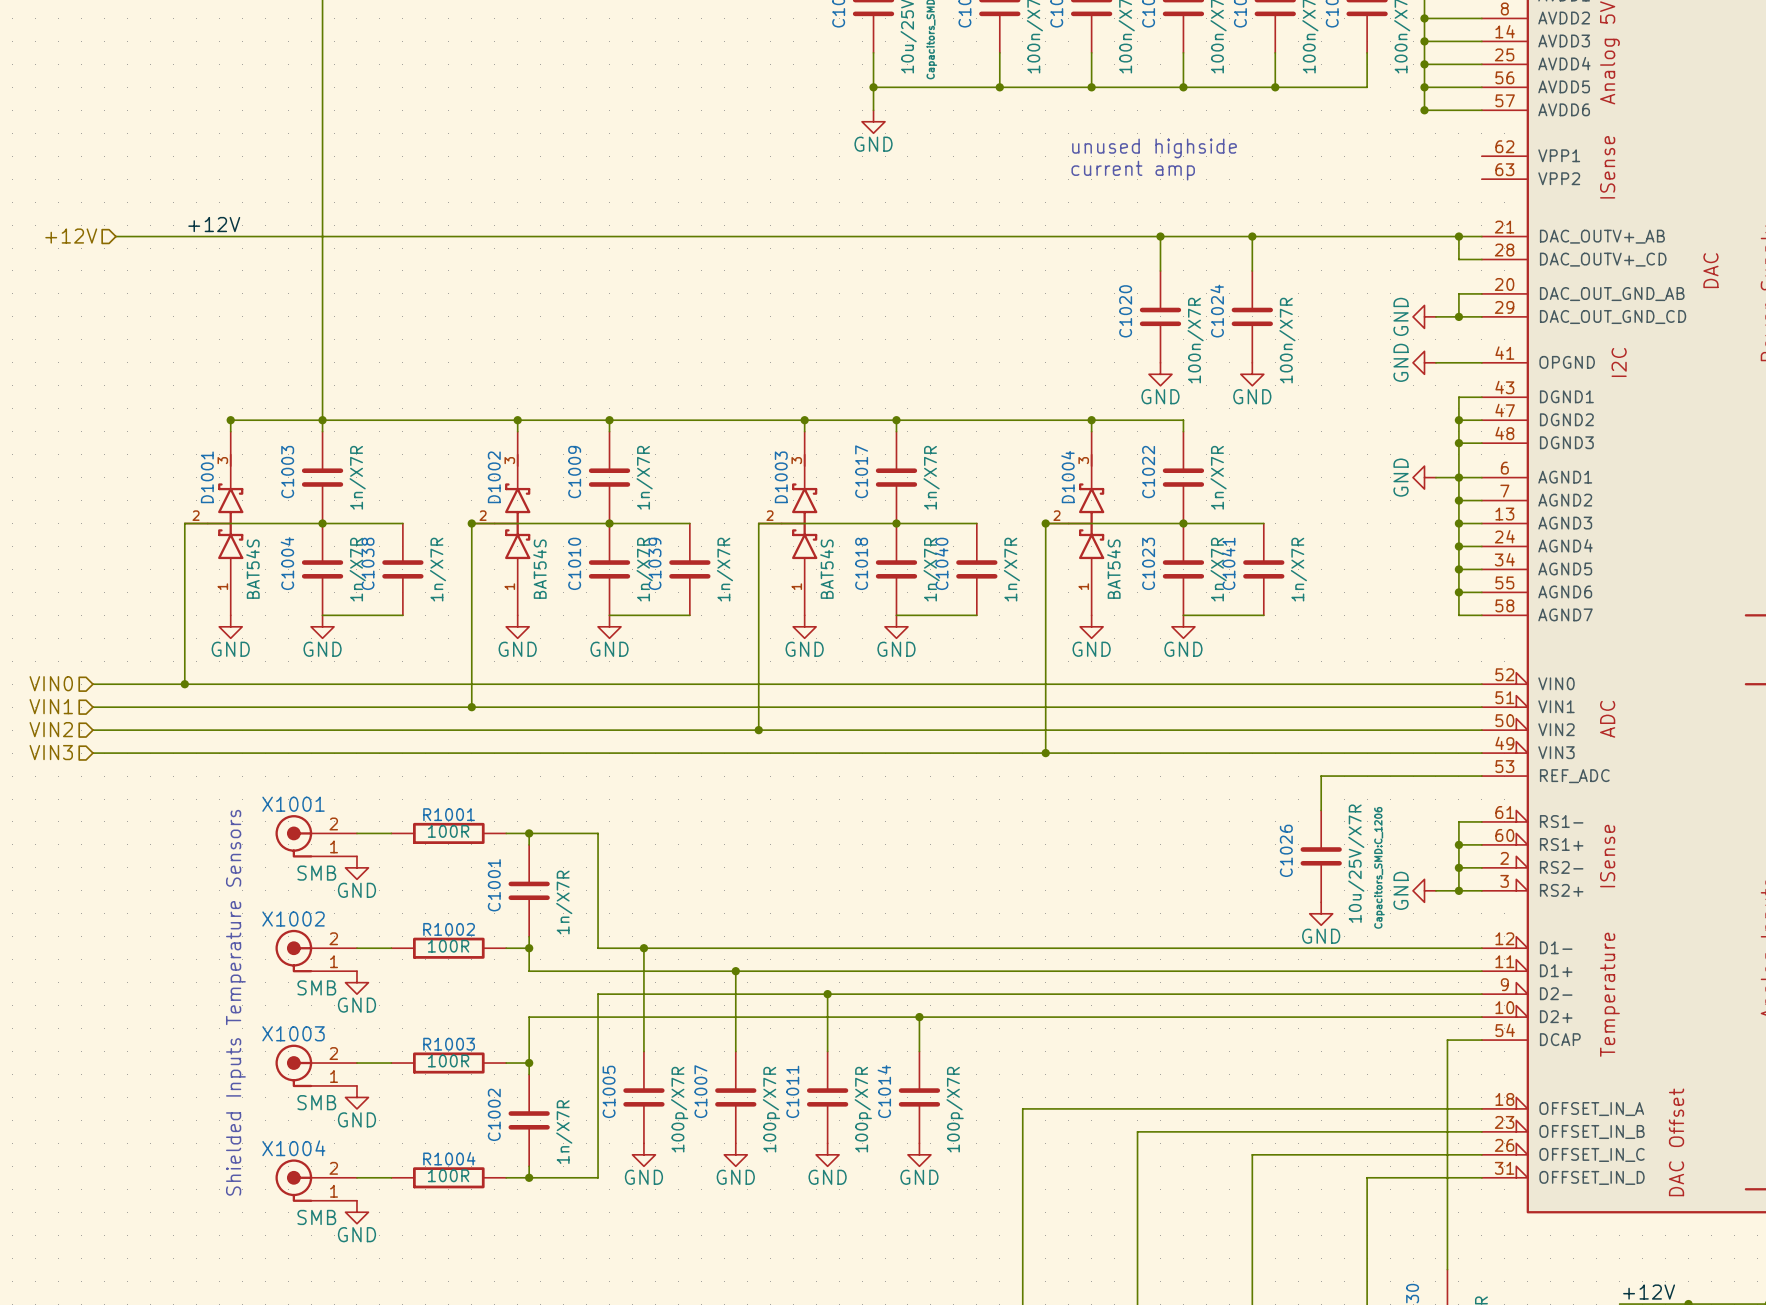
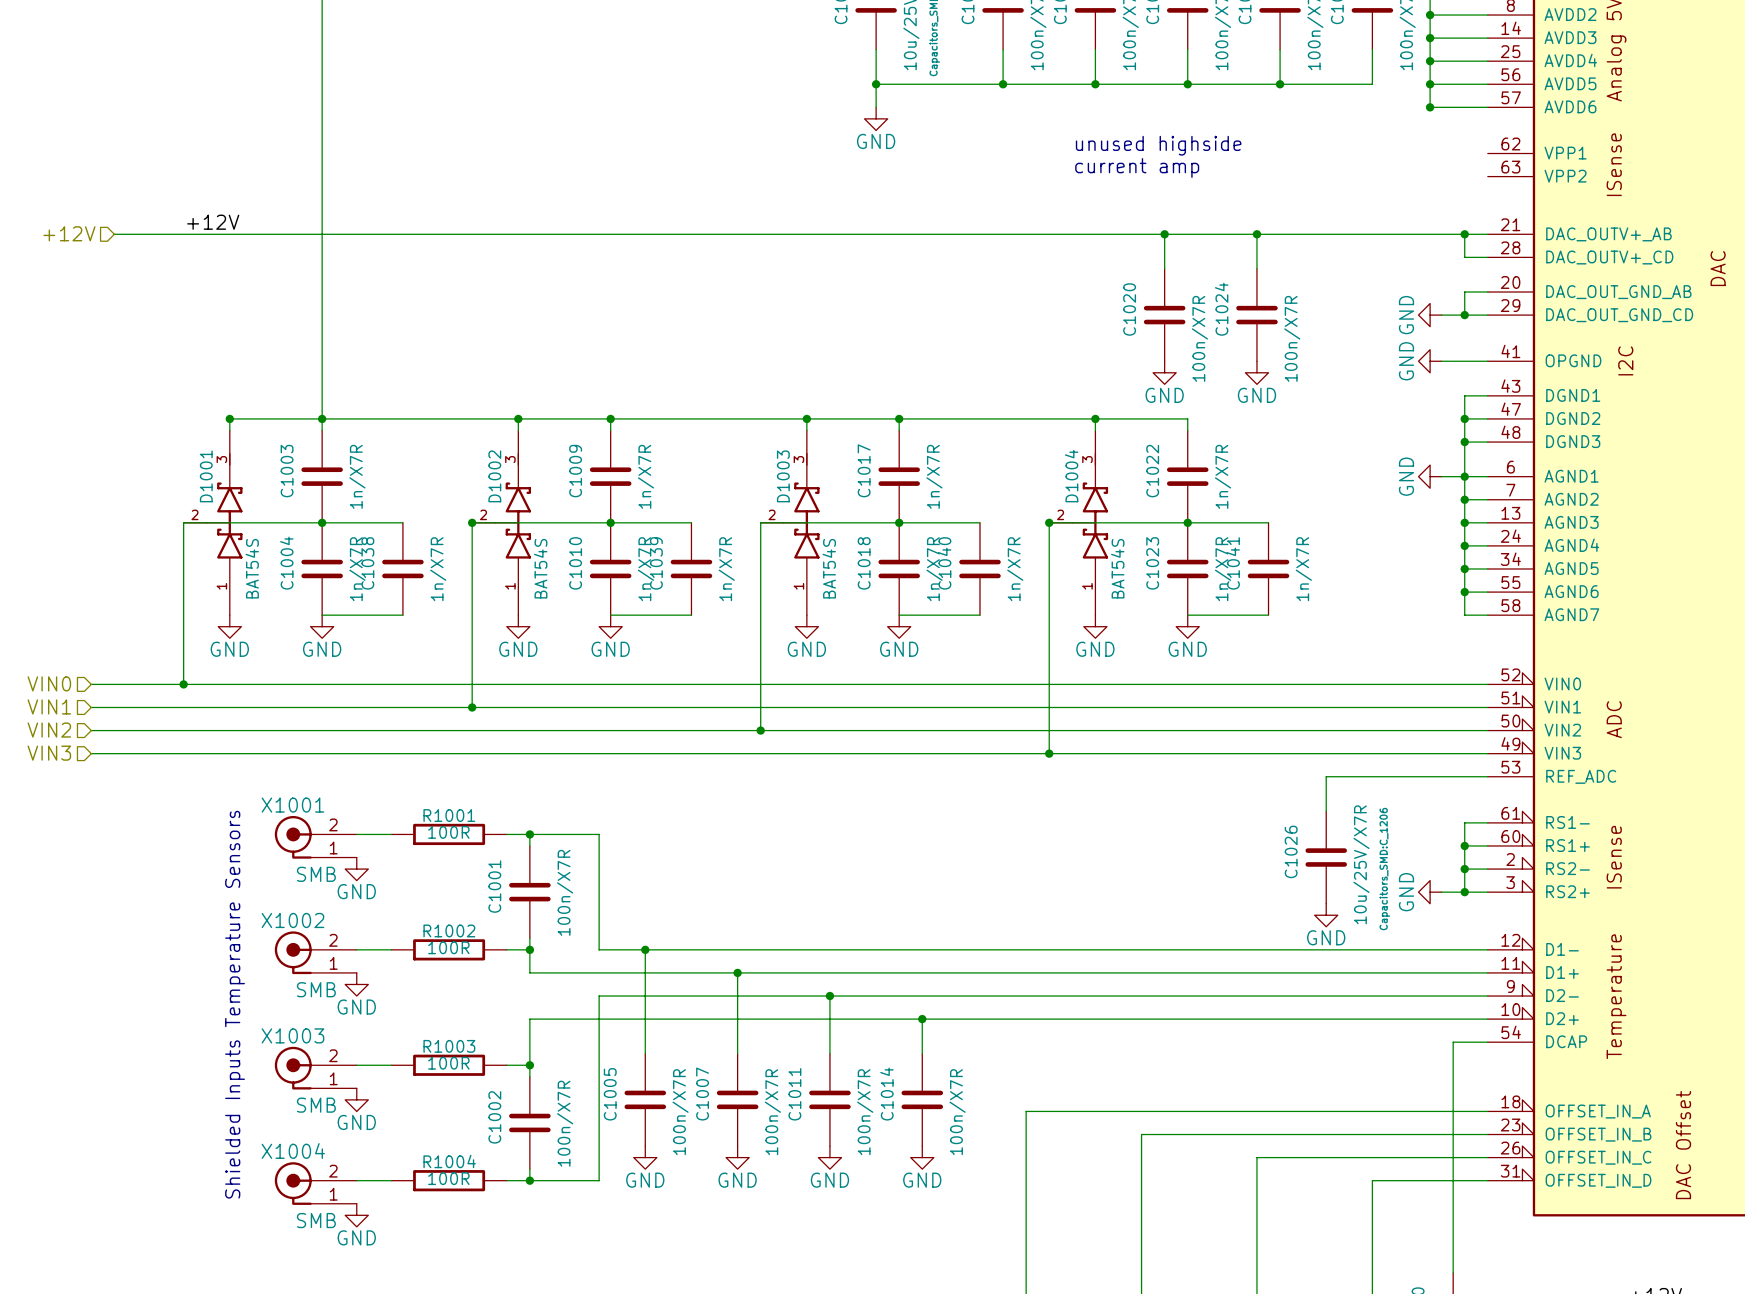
C1001 value: 1n/X7R (564, 902) -> 100n/X7R (565, 892)
C1005 value: 100p/X7R (679, 1109) -> 100n/X7R (680, 1112)
C1007 value: 100p/X7R (771, 1109) -> 100n/X7R (772, 1112)
C1011 value: 100p/X7R (863, 1109) -> 100n/X7R (865, 1112)
C1014 value: 100p/X7R (955, 1109) -> 100n/X7R (957, 1112)
C1002 value: 1n/X7R (564, 1132) -> 100n/X7R (565, 1123)

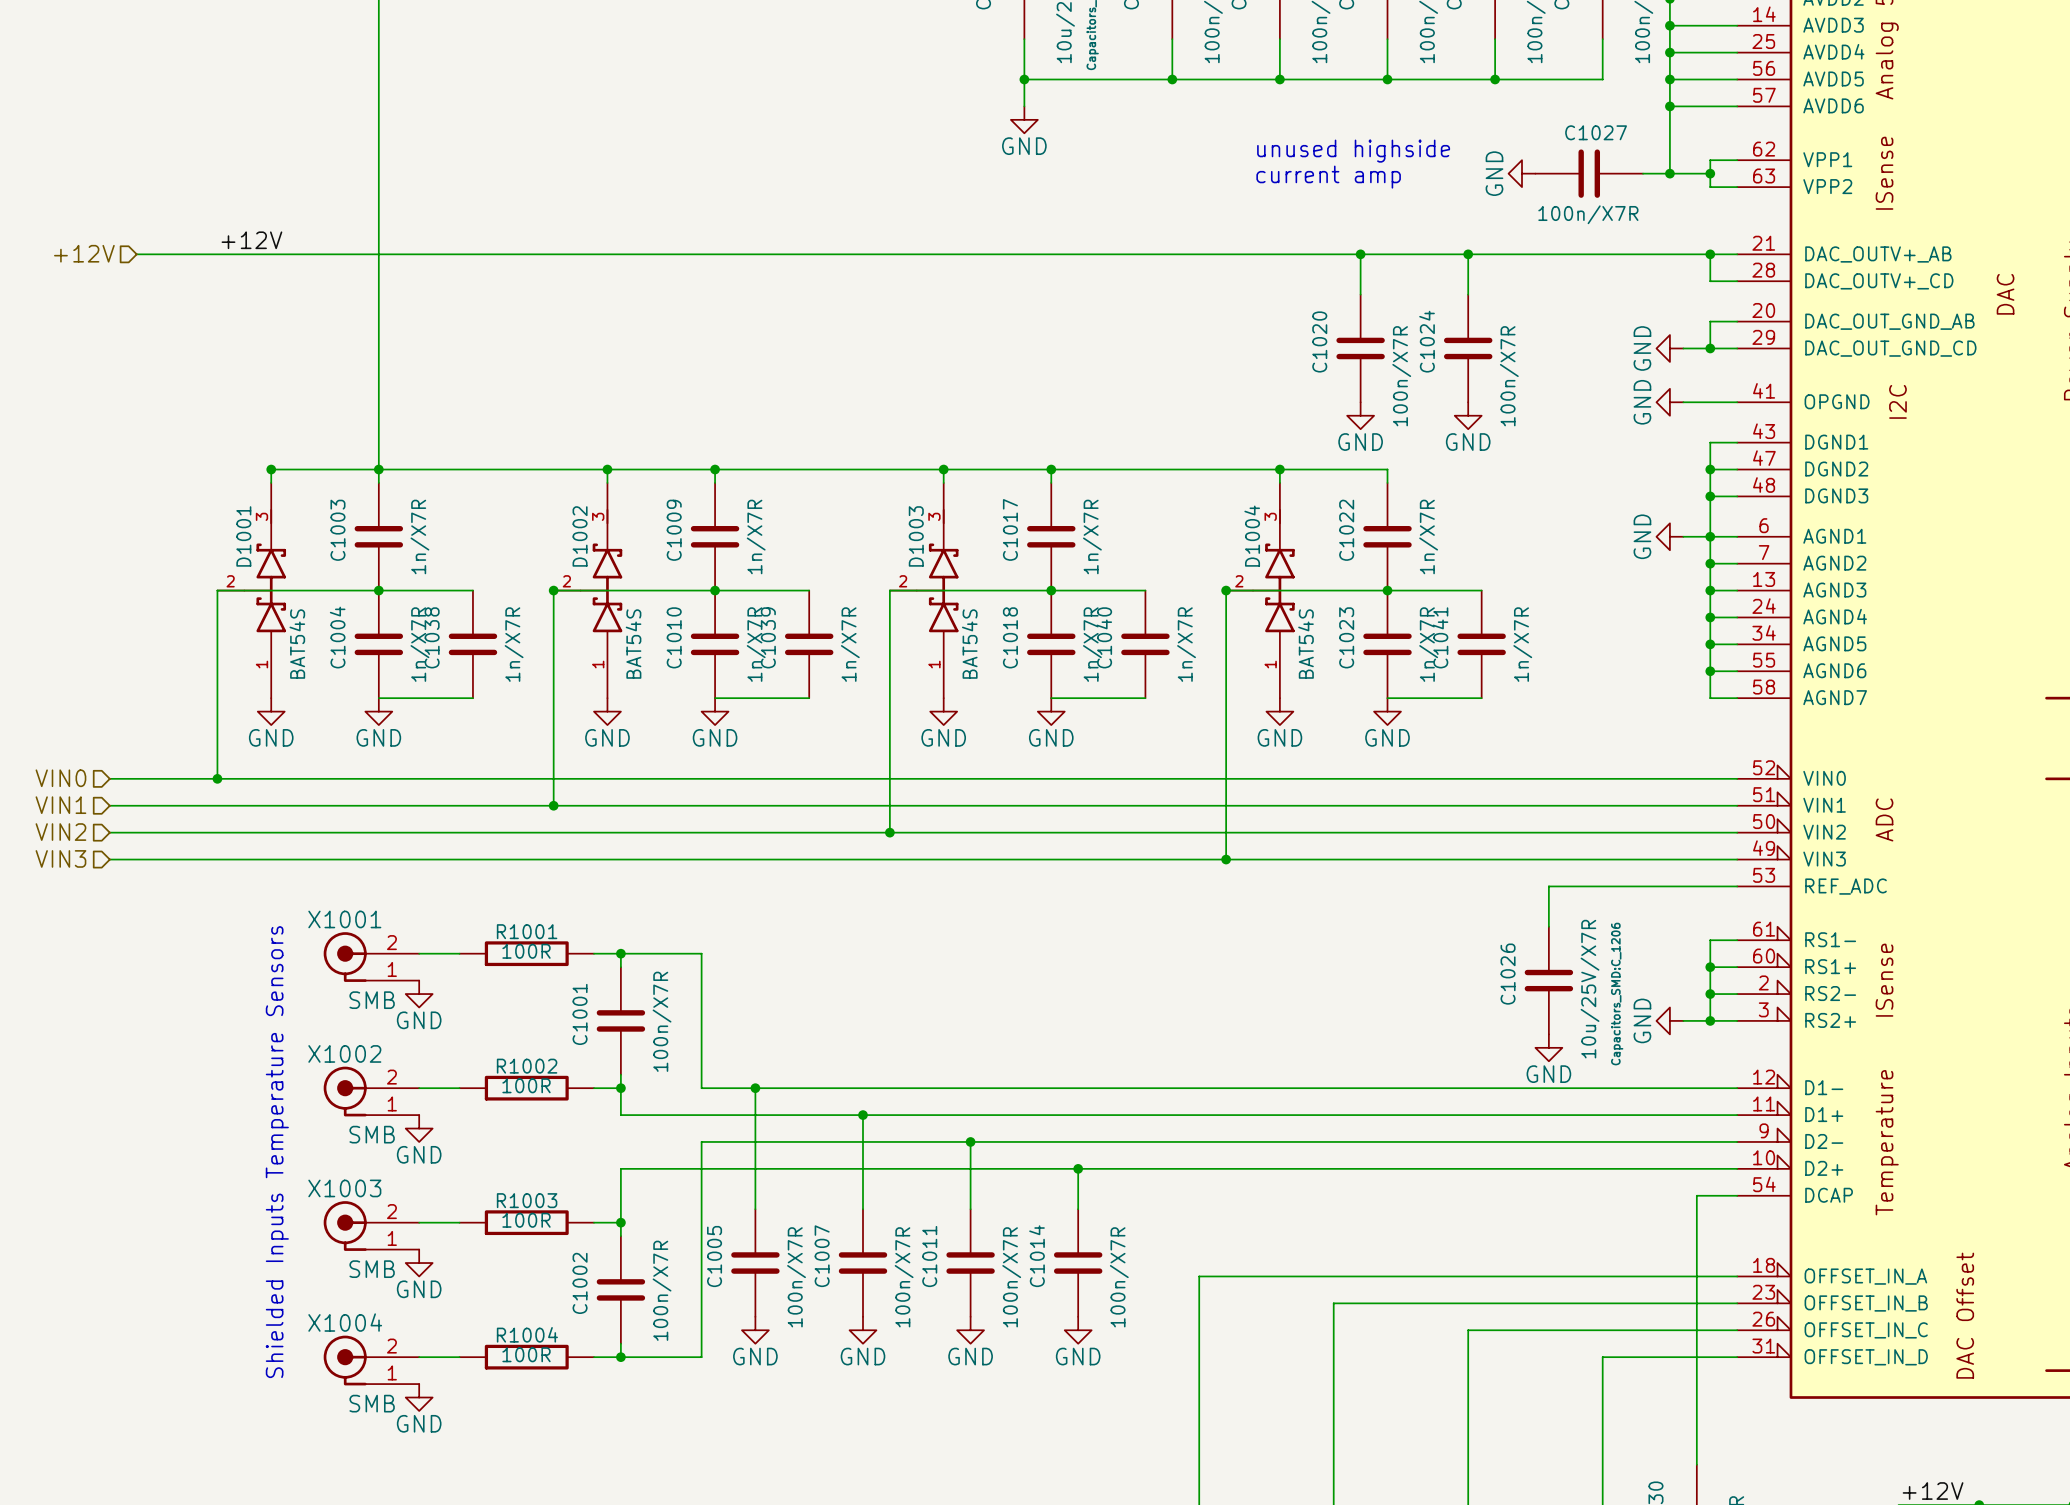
wire: none -> (1669, 106) (1669, 173)
wire: none -> (1737, 160) (1710, 160) (1710, 187) (1737, 187)
power symbol: none -> GND (1522, 173)
C1027: none -> 100n/X7R (1589, 173)
wire: none -> (1643, 173) (1710, 173)
junction: none -> (1669, 173)
junction: none -> (1710, 173)

